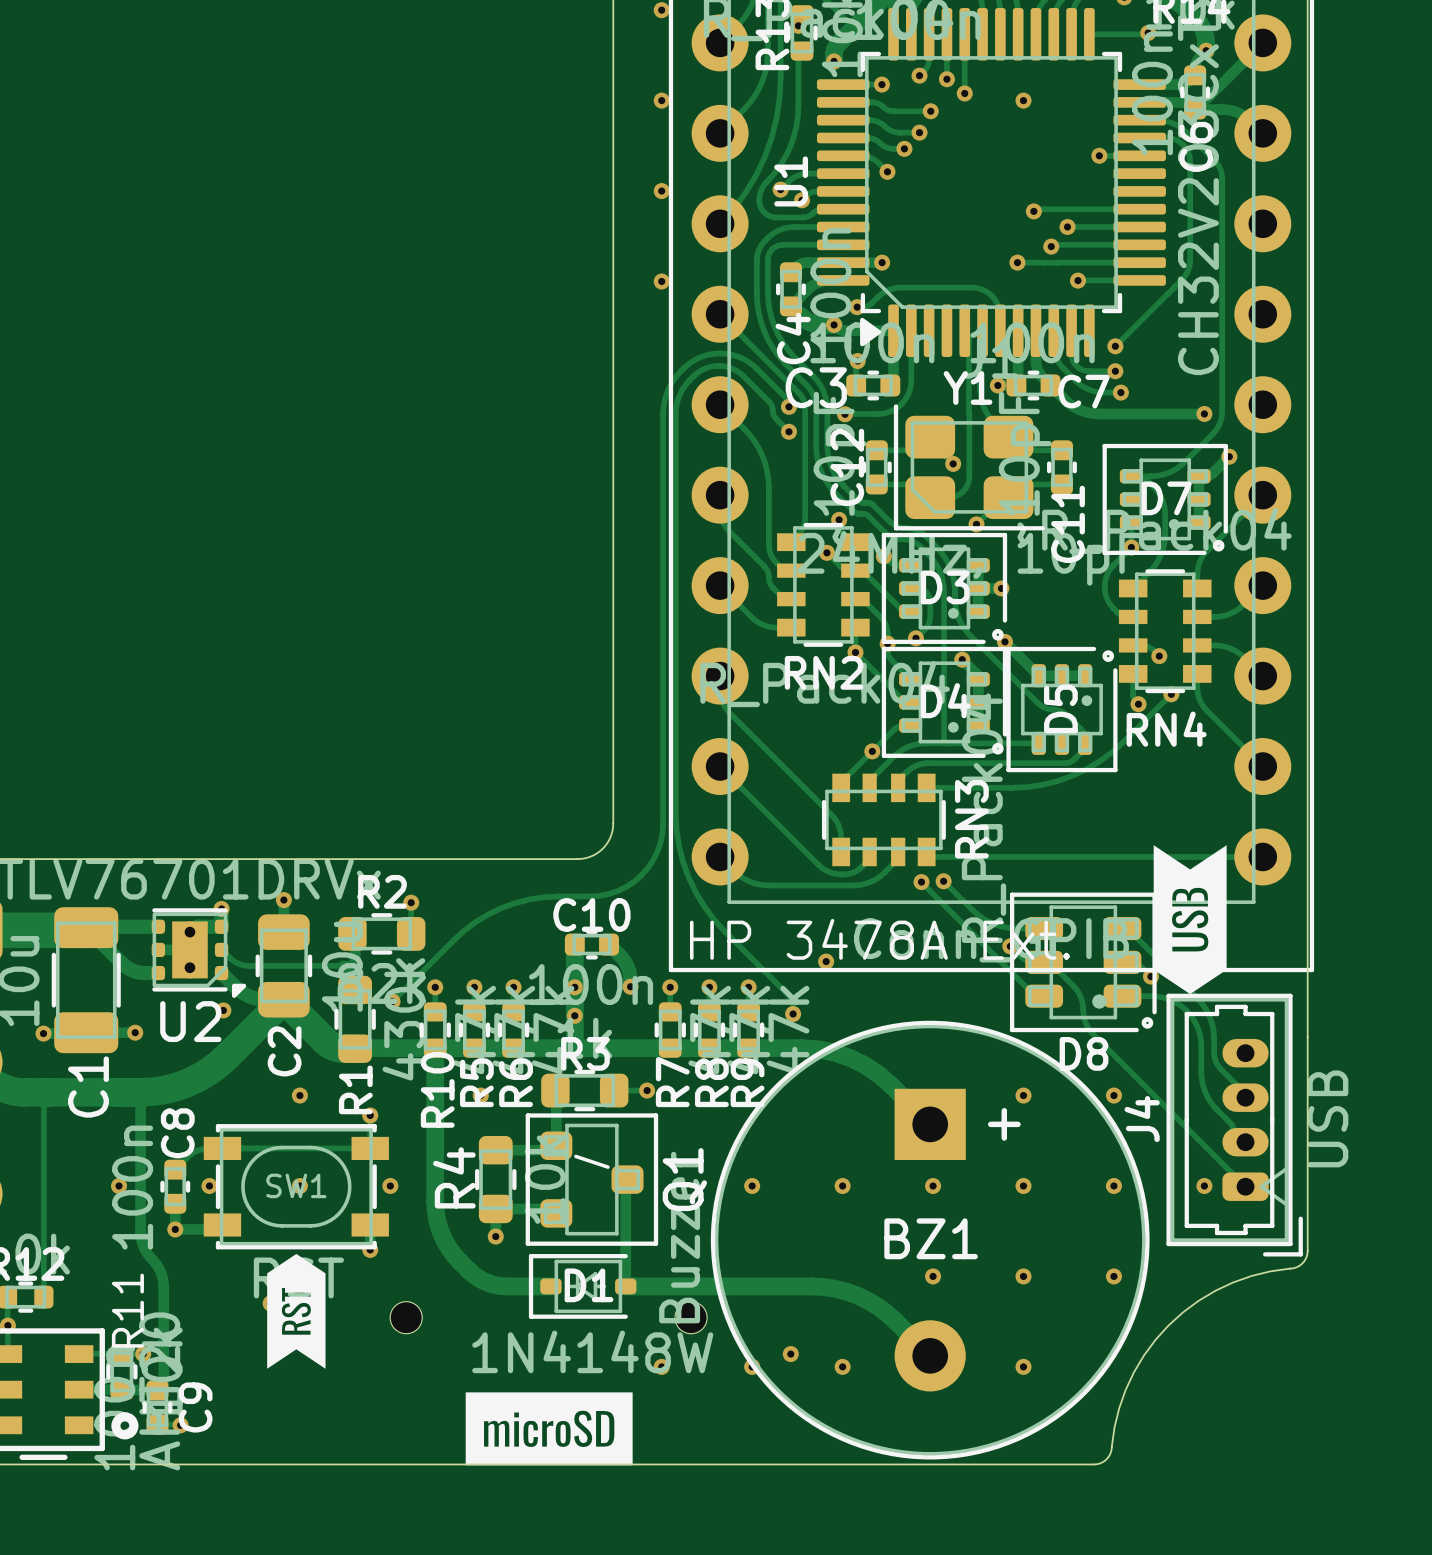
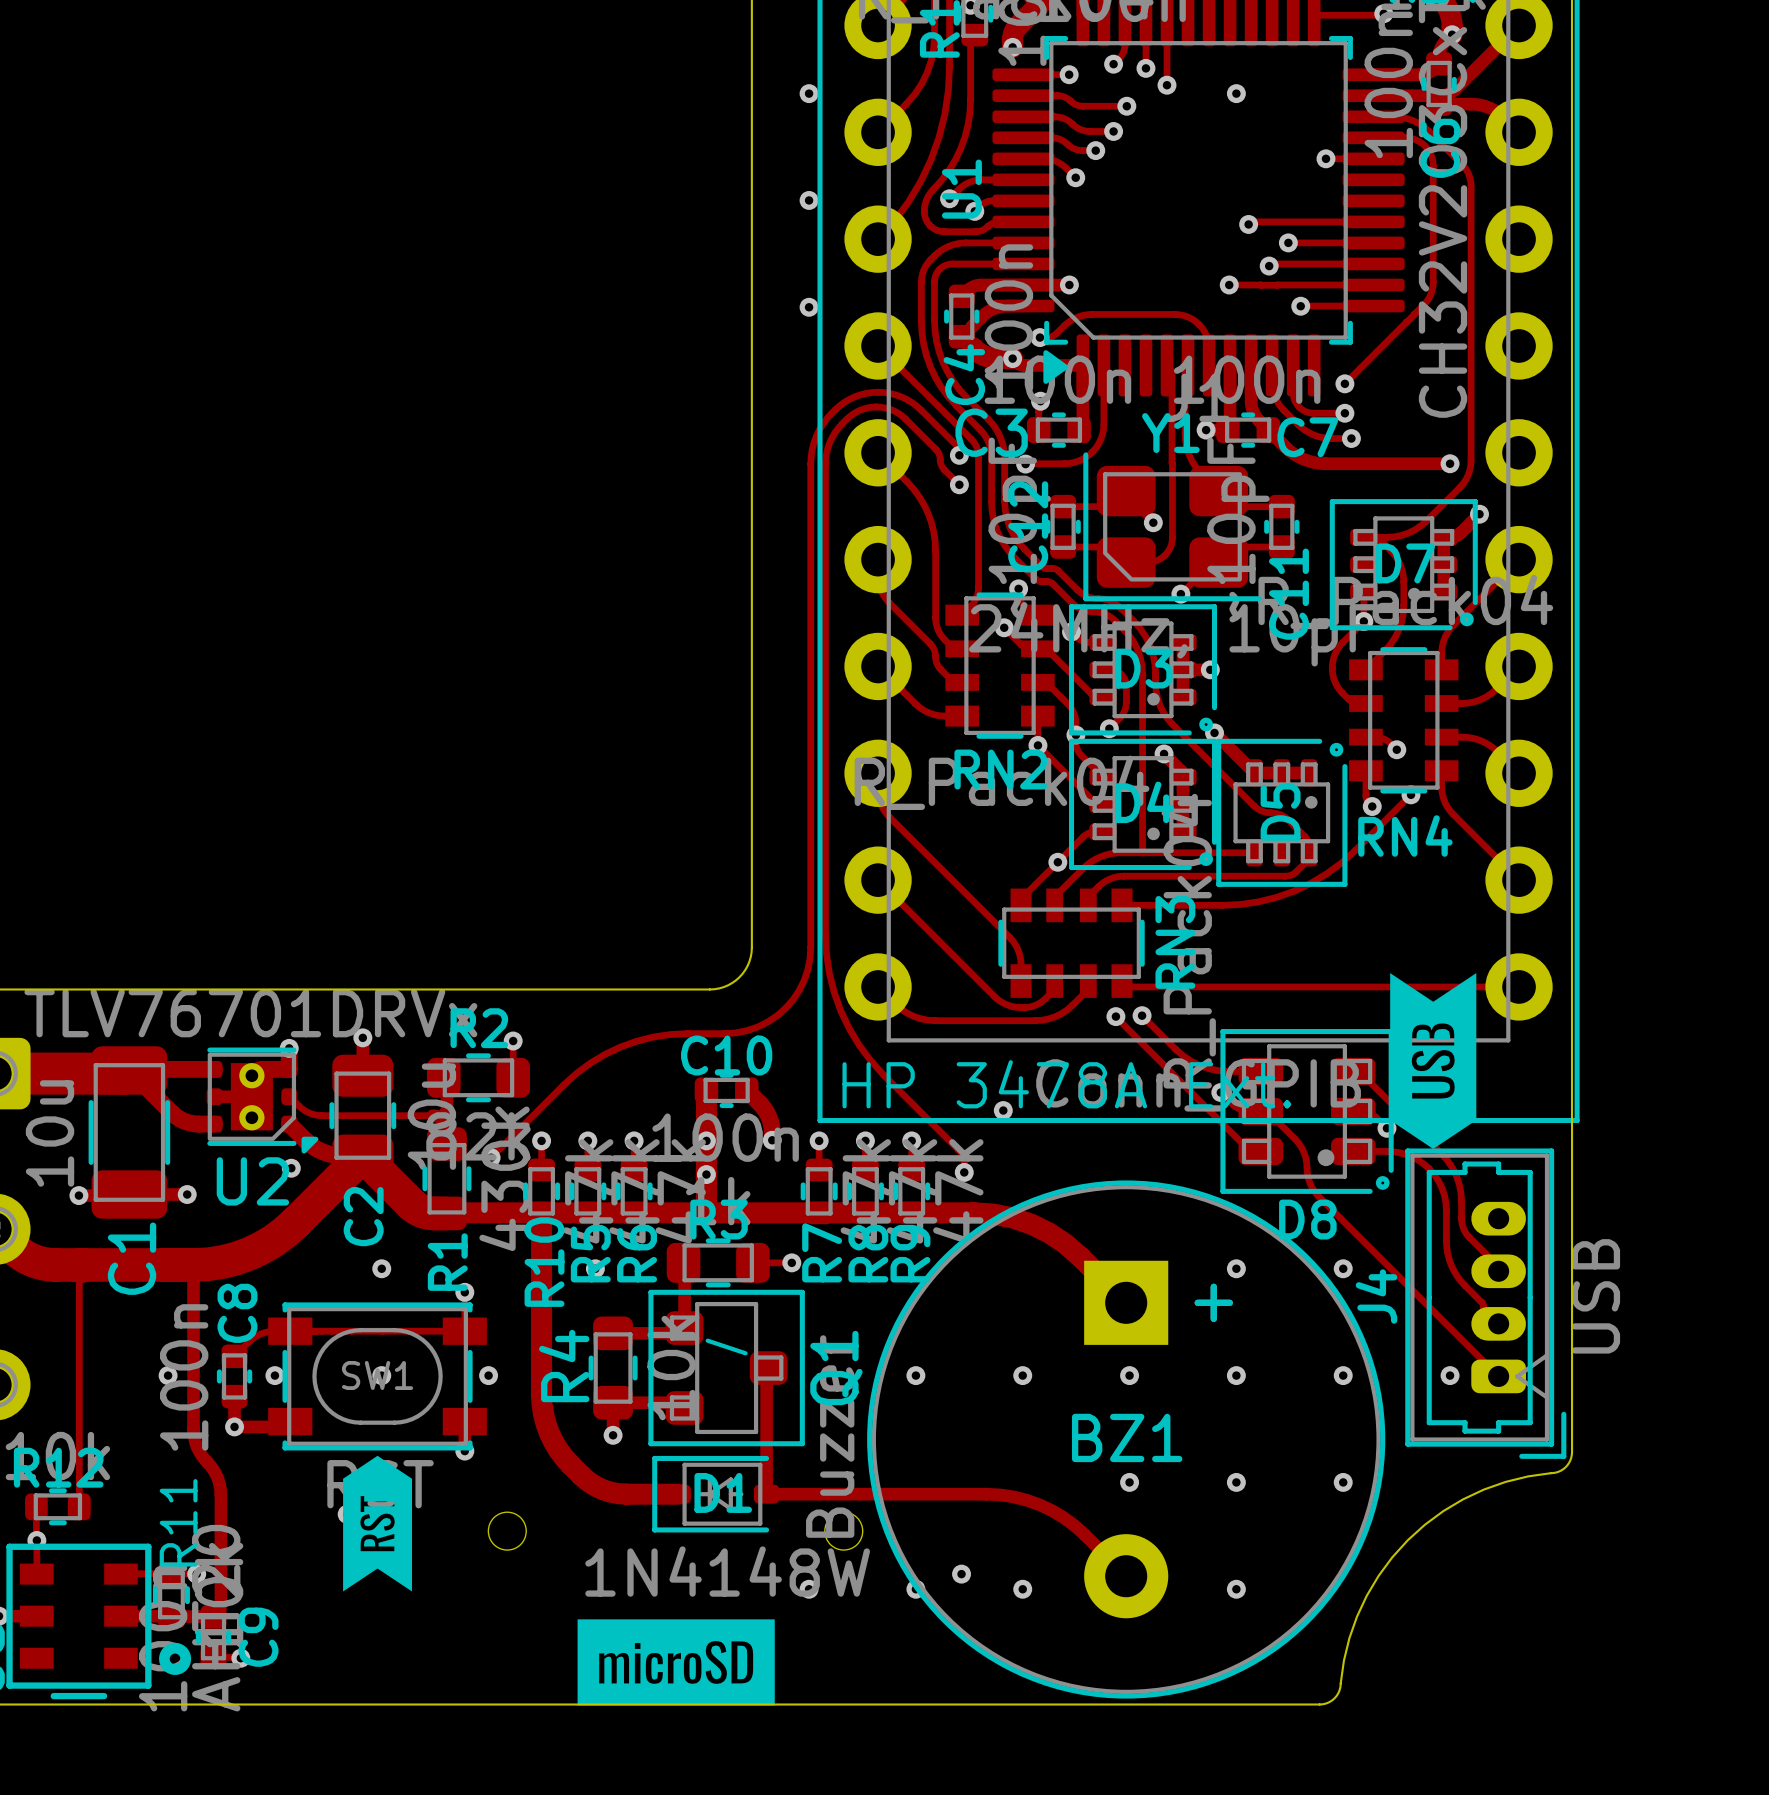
track width: thick (625, 1286) (811, 1286) (834, 1288) (857, 1295) (877, 1306) (895, 1321) (930, 1355) -> thin (766, 1494) (986, 1494) (1013, 1496) (1039, 1504) (1063, 1517) (1085, 1535) (1126, 1576)

